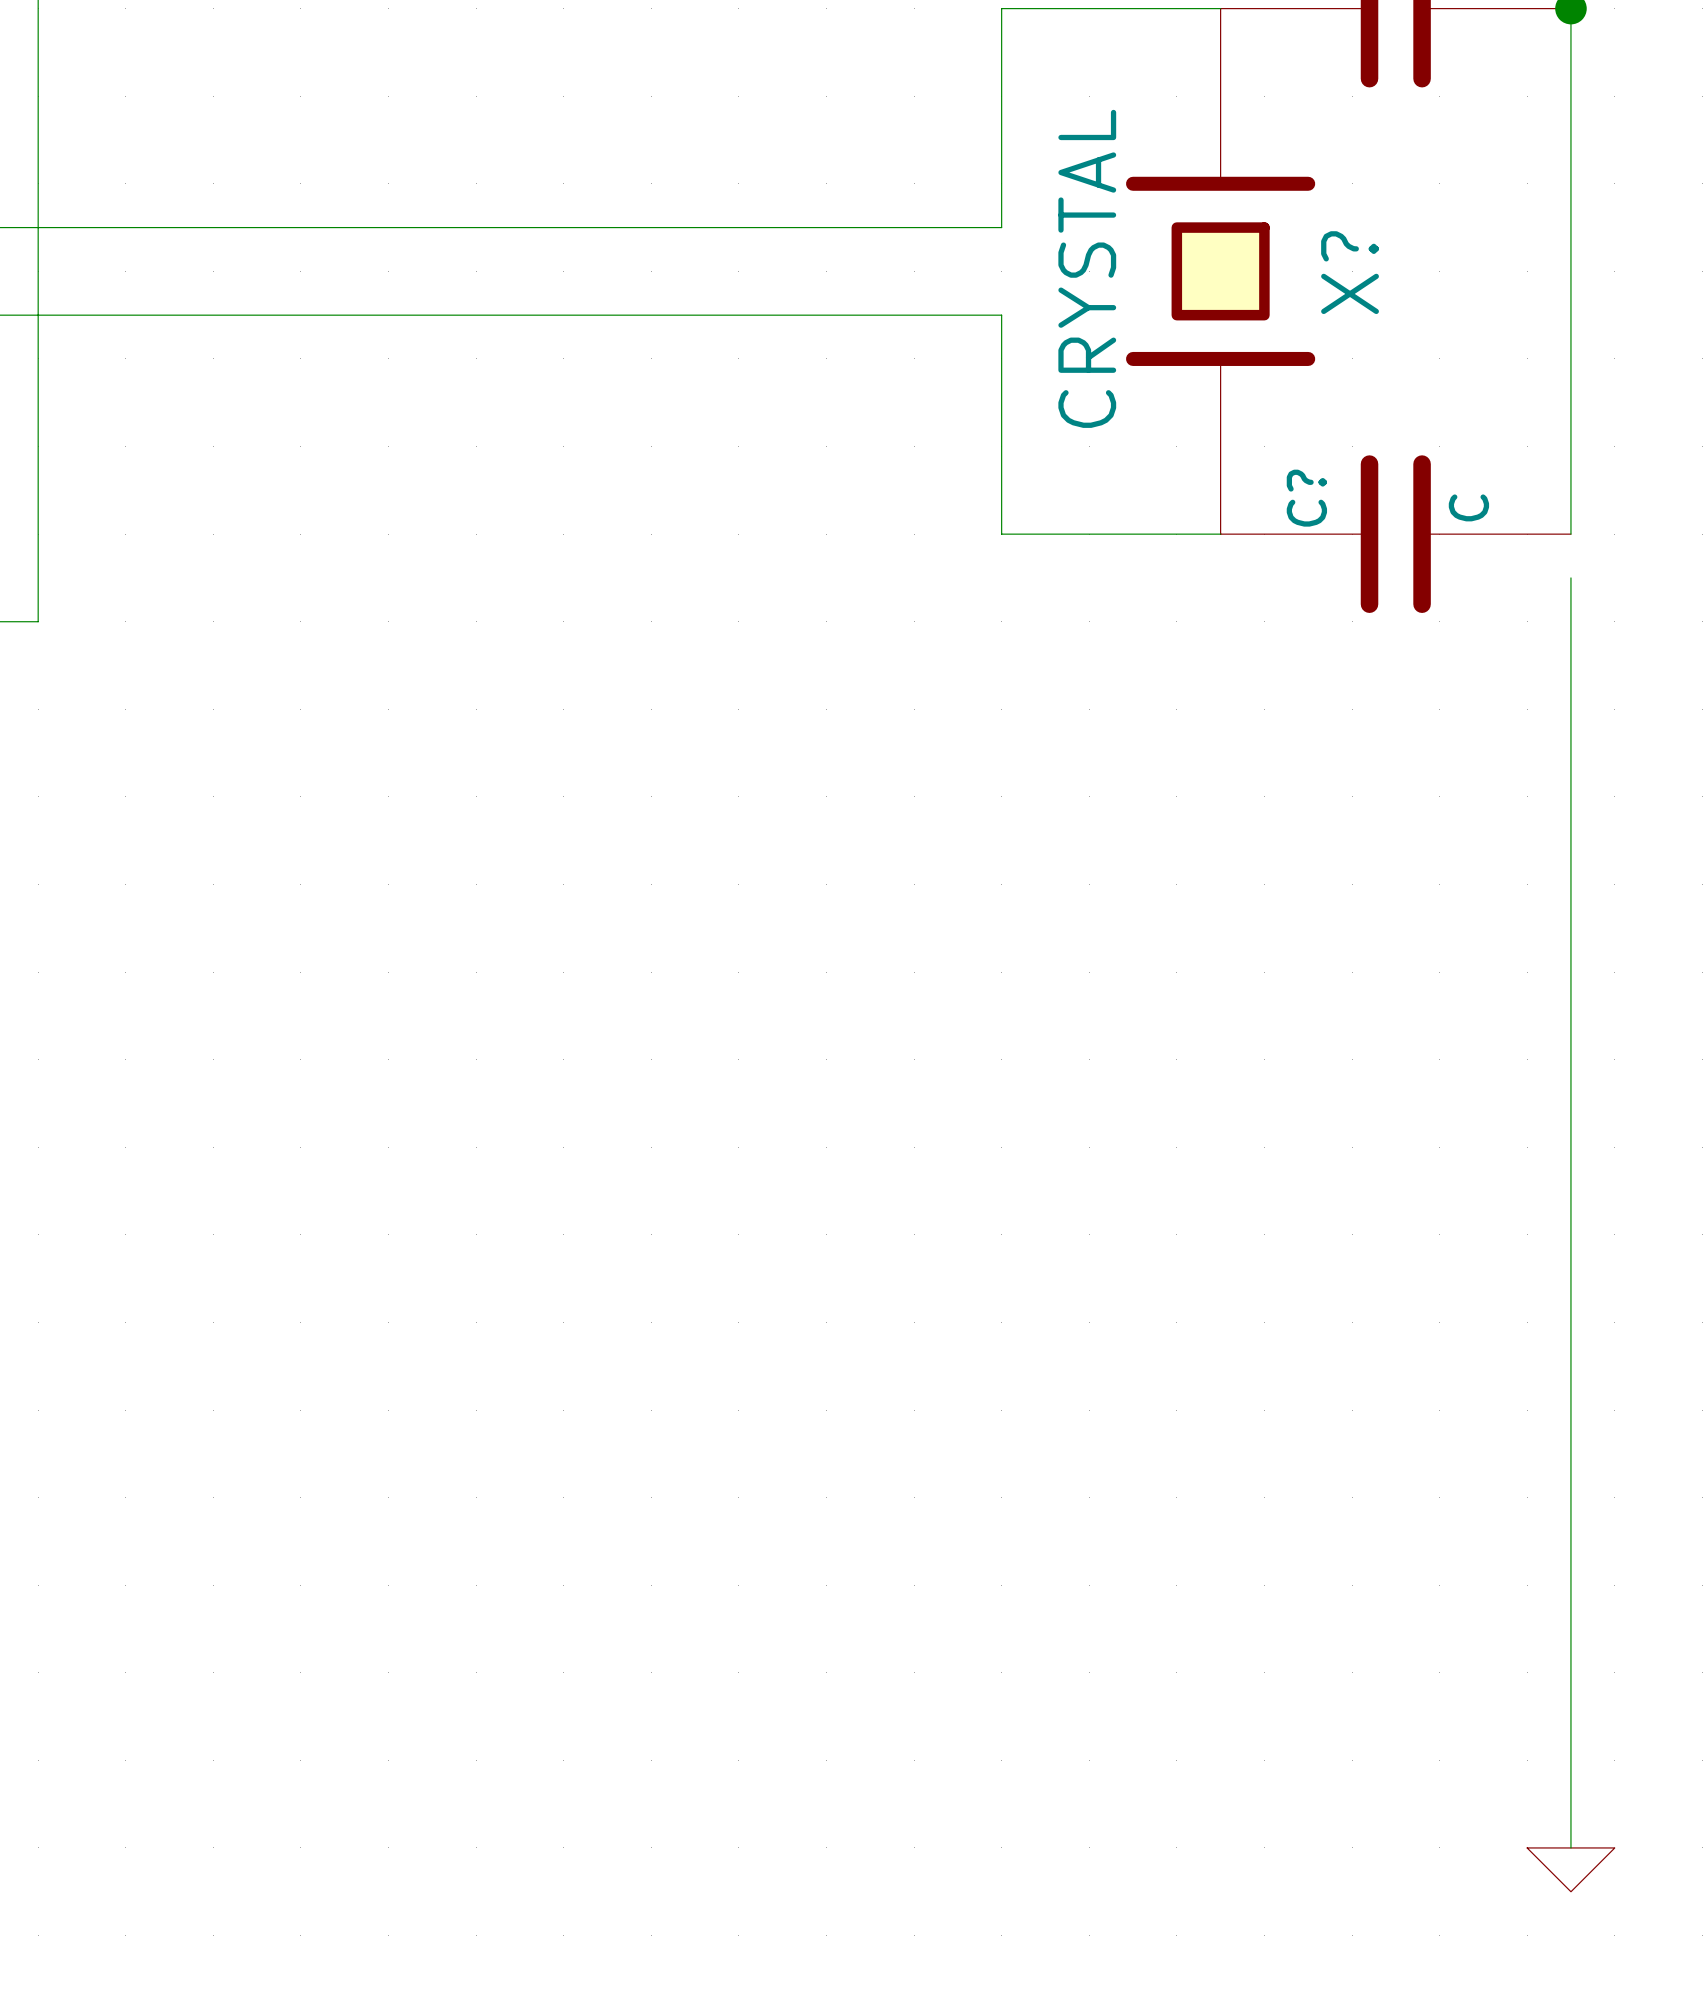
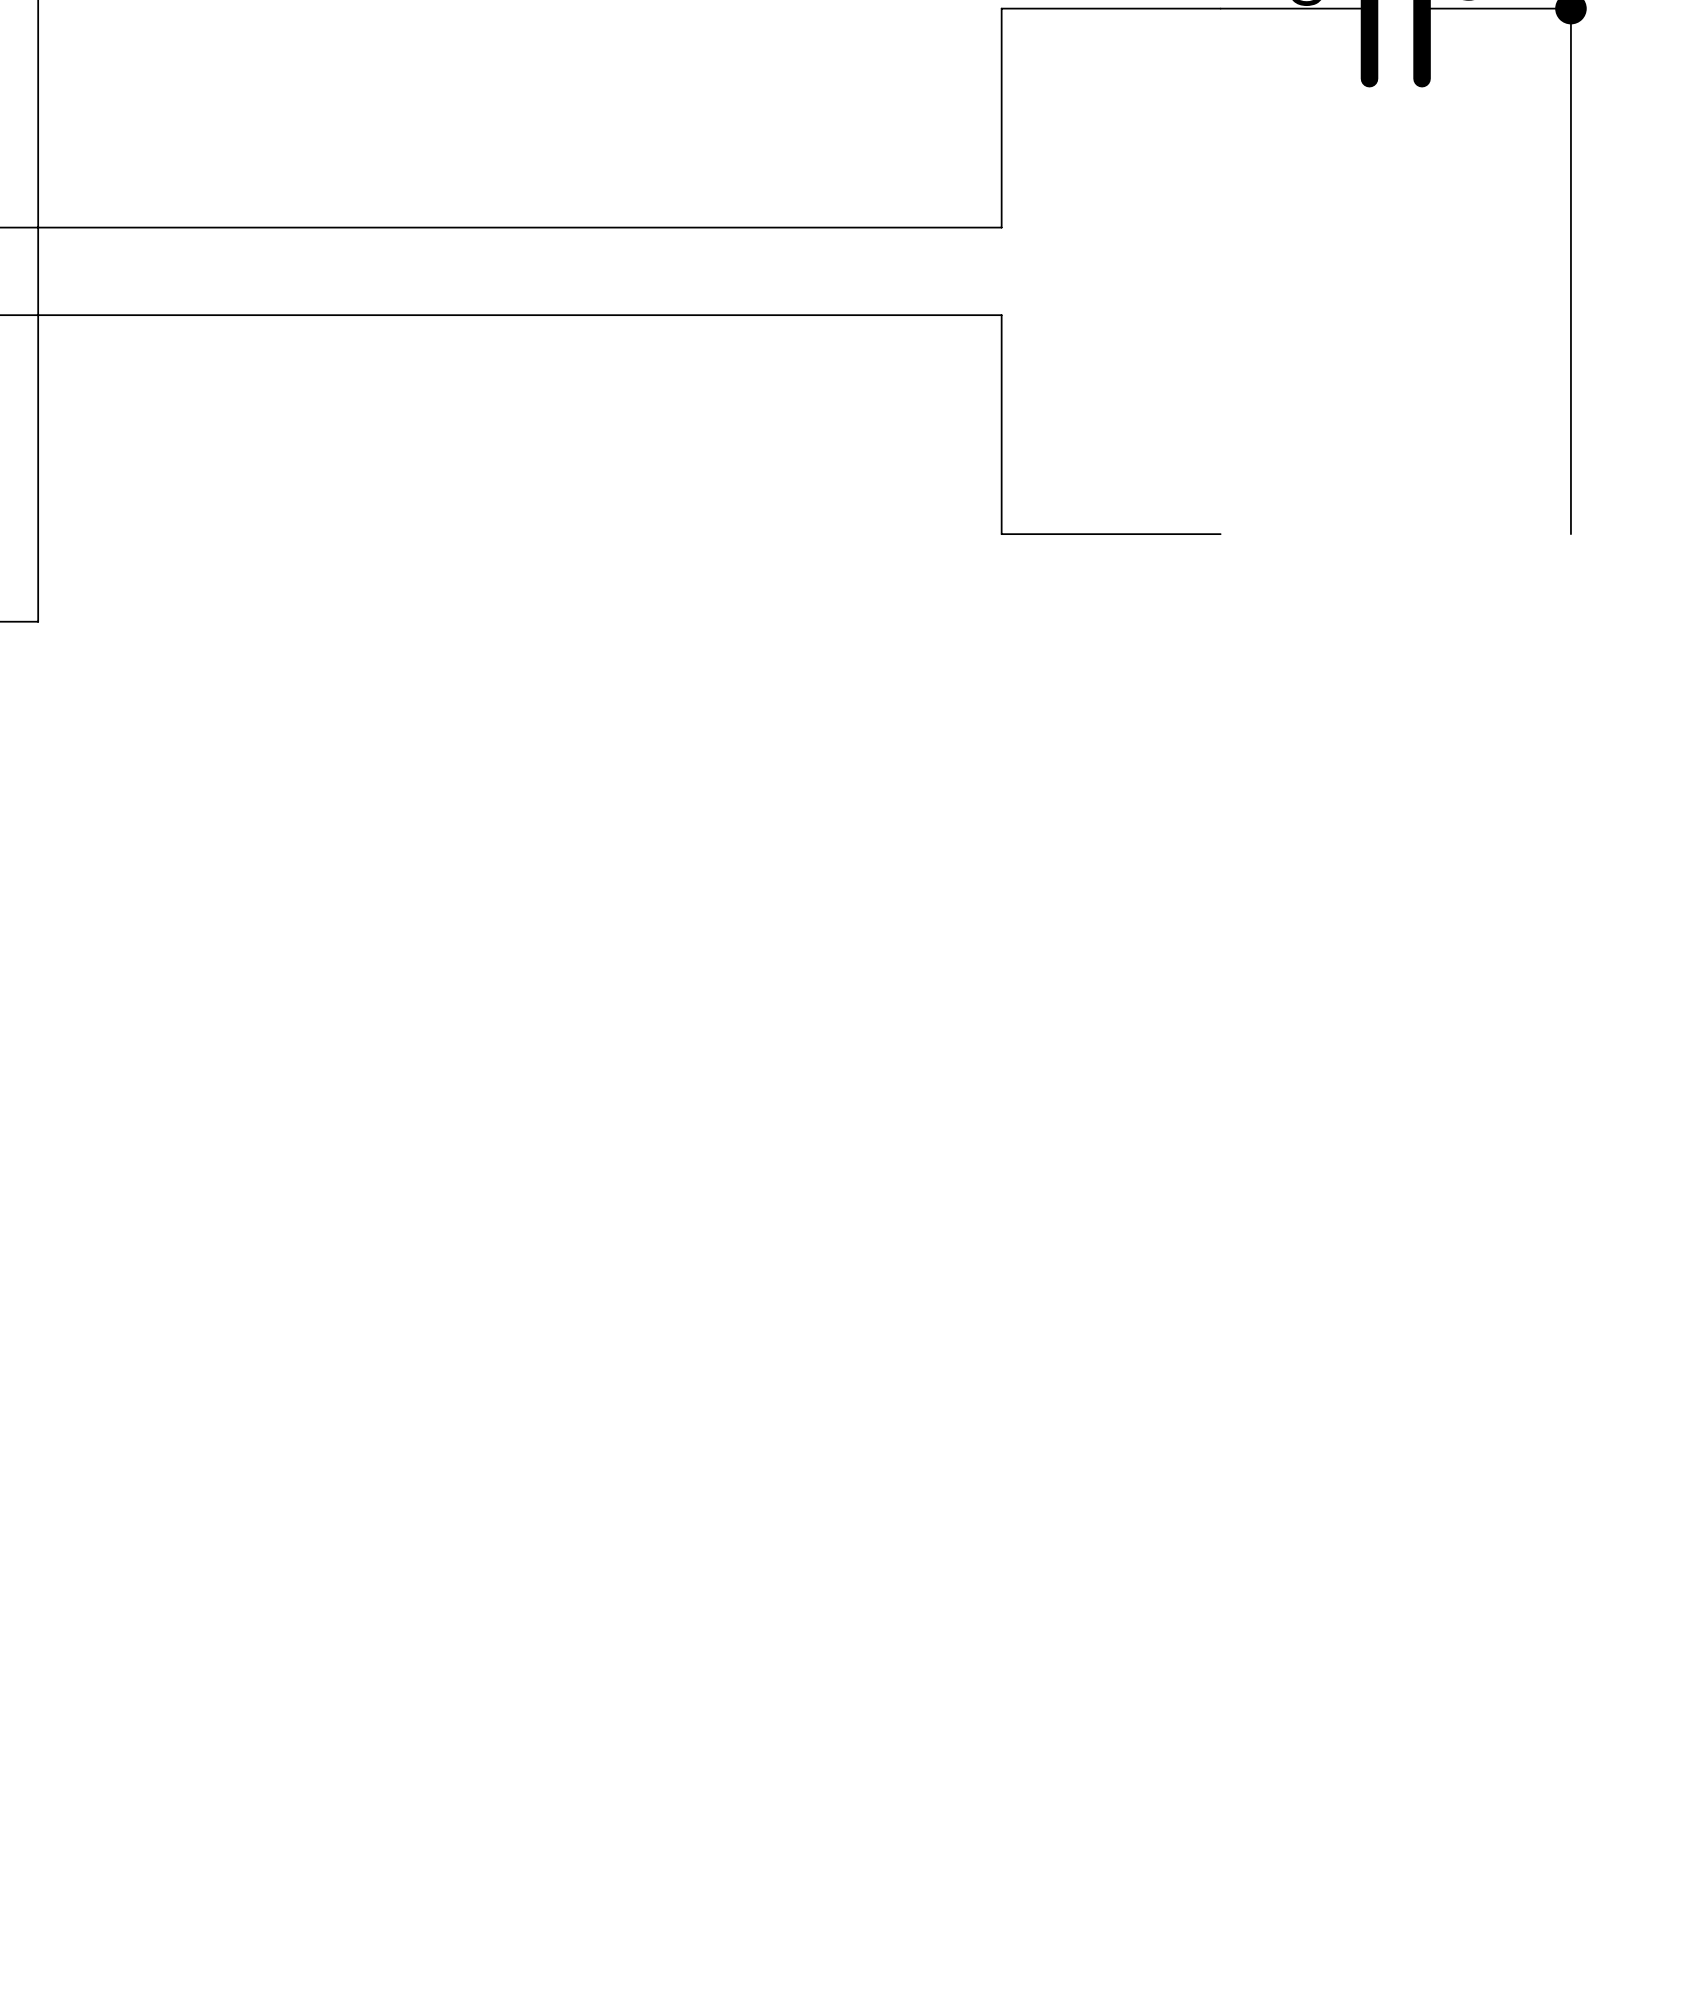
X?: CRYSTAL (1220, 271) -> none
C?: C (1395, 534) -> none
wire: (1570, 577) (1570, 1847) -> none
power symbol: (1570, 1869) -> none

